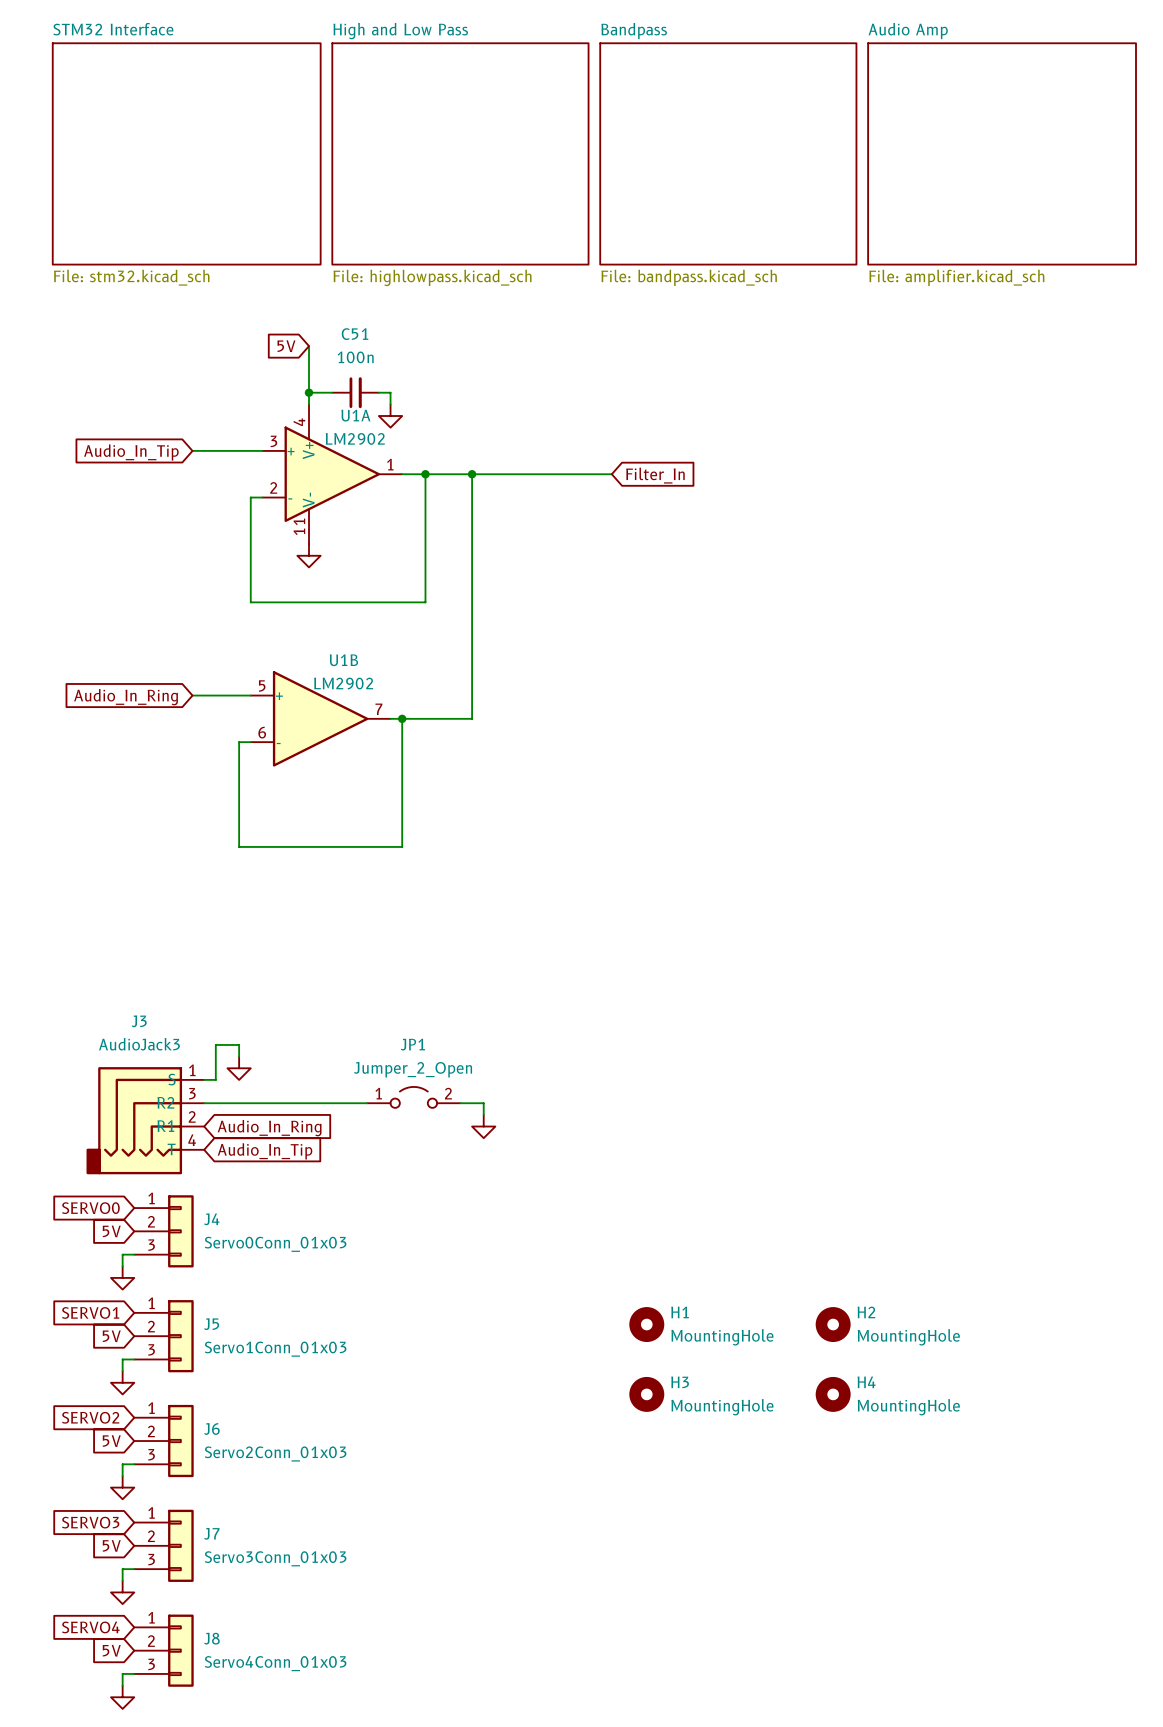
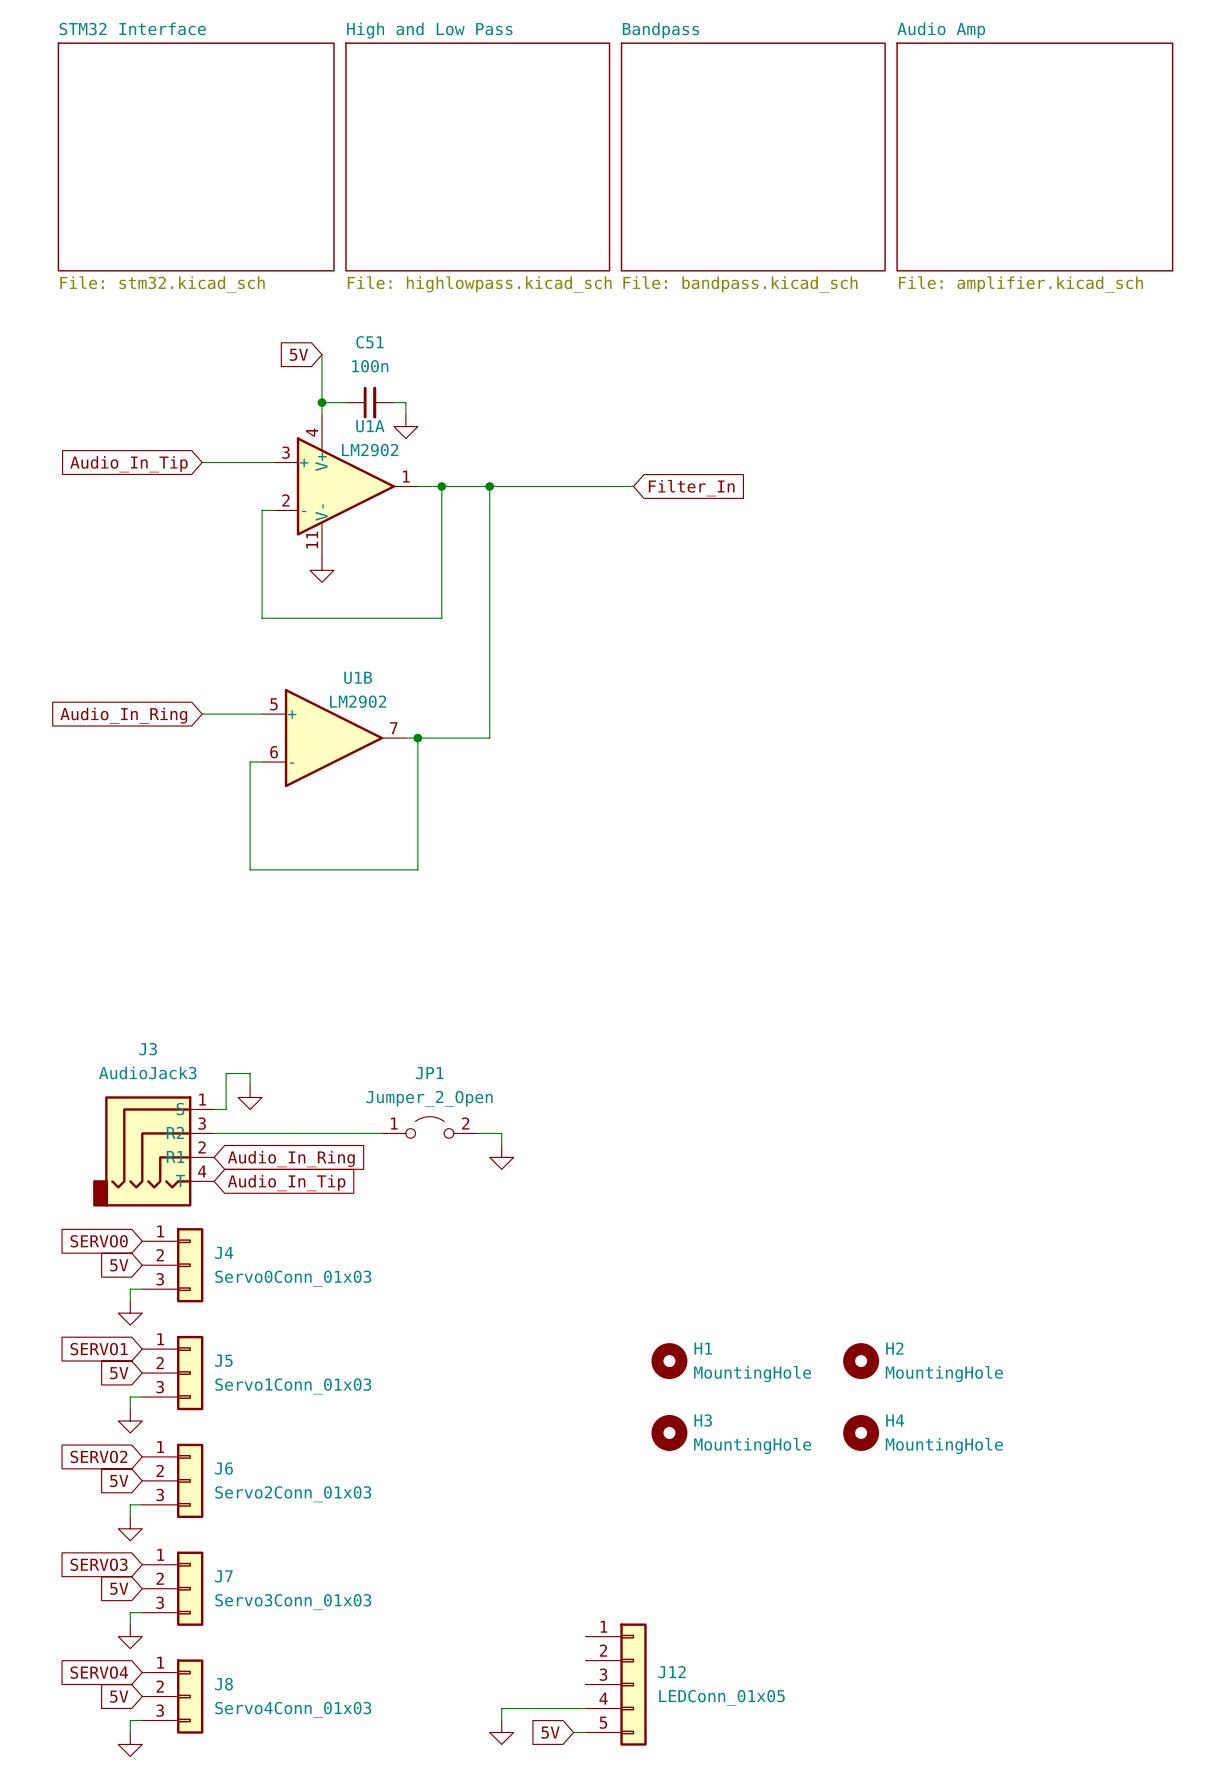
J12: none -> LEDConn_01x05 (616, 1684)
wire: none -> (585, 1708) (501, 1708) (501, 1720)
power symbol: none -> (501, 1732)
global label: none -> 5V (550, 1732)
wire: none -> (573, 1732) (585, 1732)

